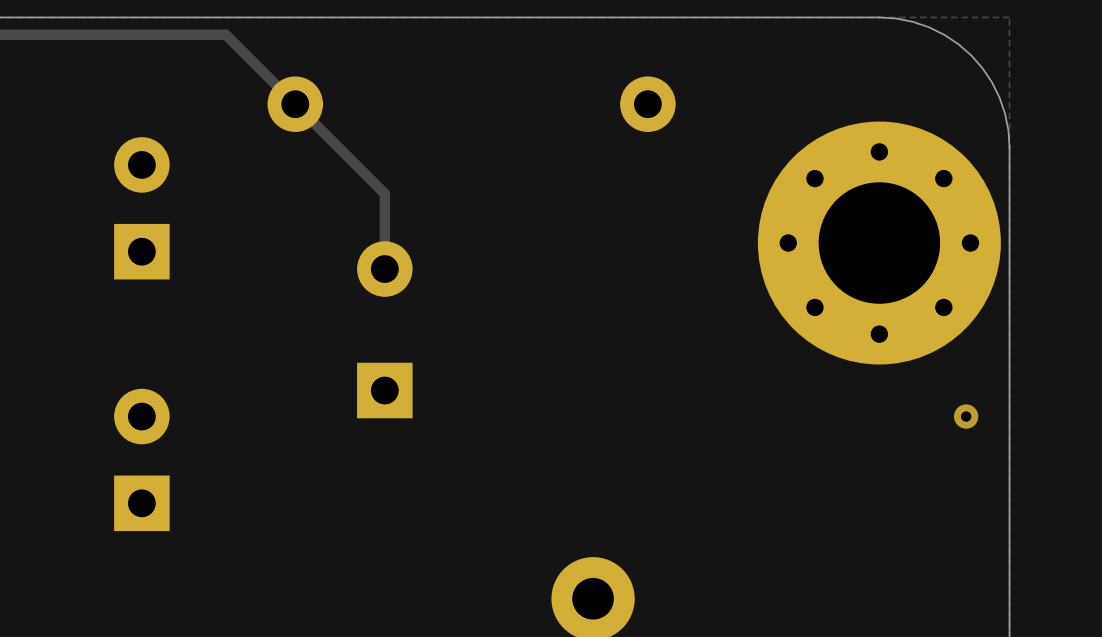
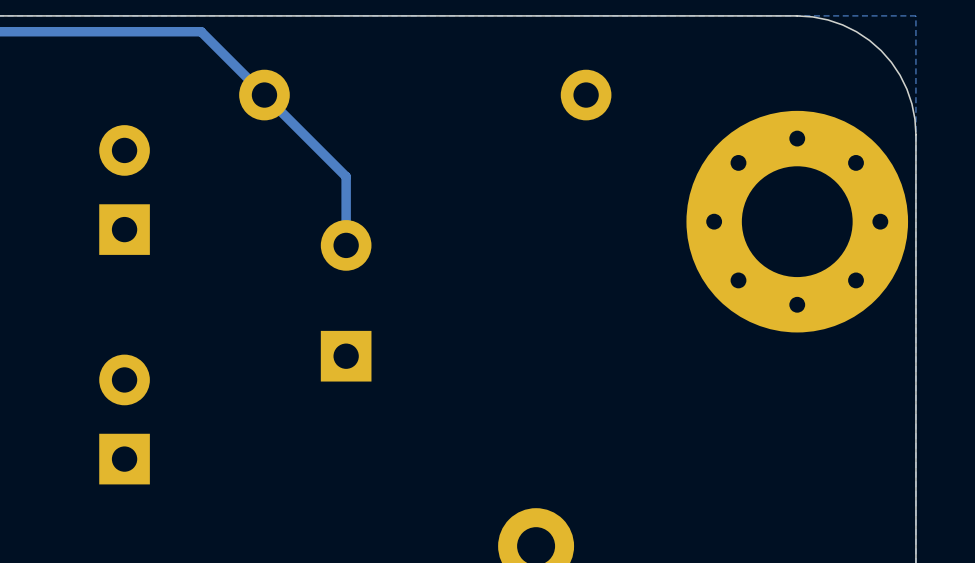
via: (966, 416) -> none

